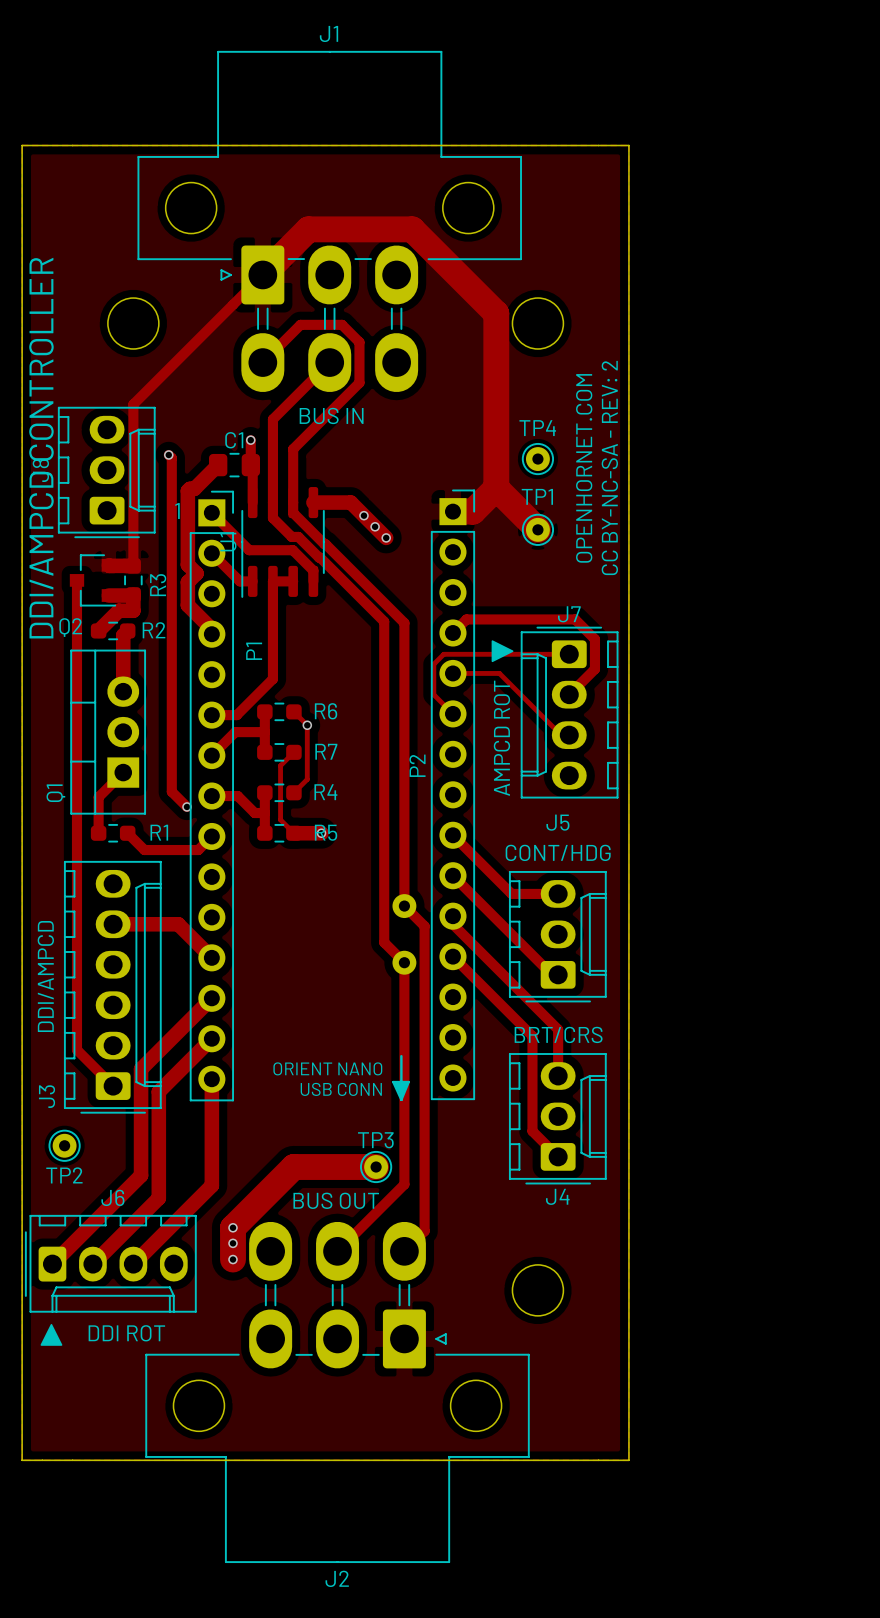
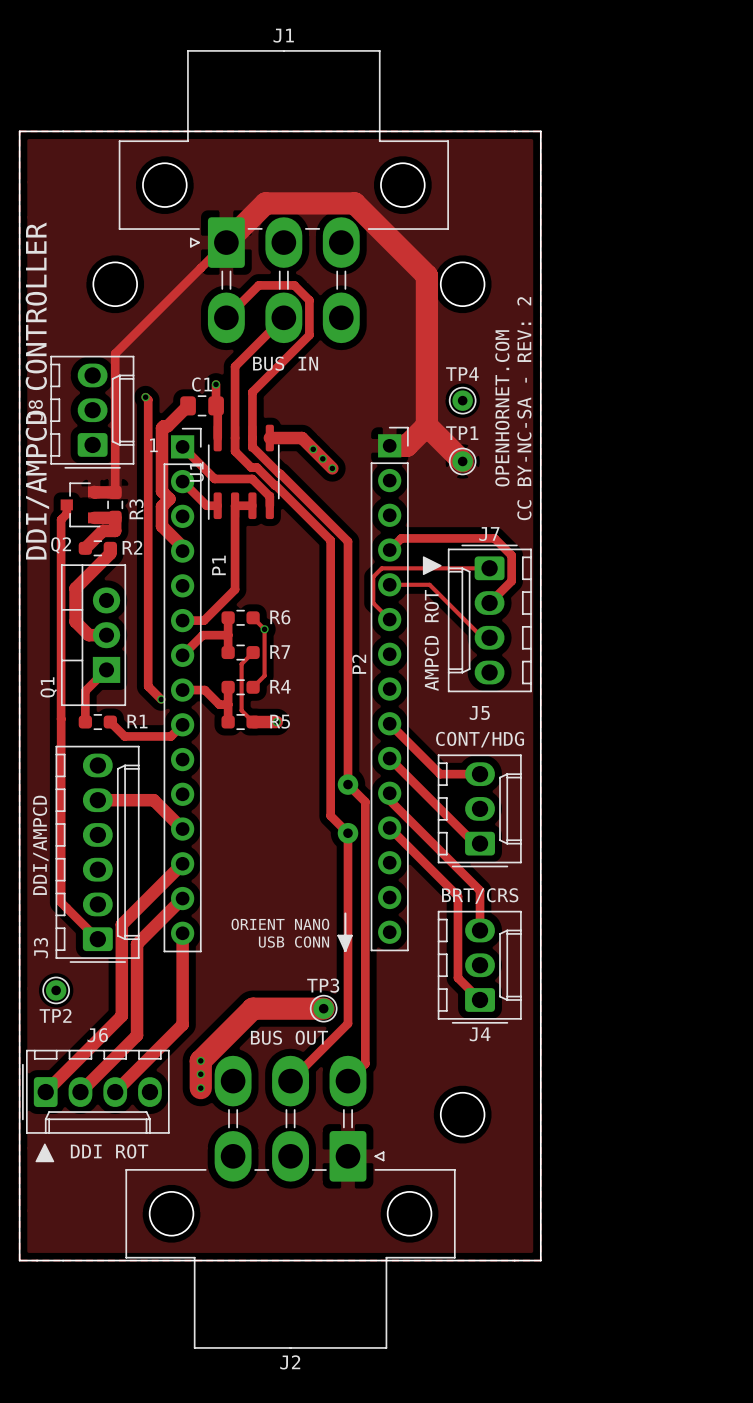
track: (76, 590) (76, 1049) -> (66, 513) (61, 519) (61, 719)
track: (127, 630) (123, 635) (123, 691) -> (110, 548) (110, 553) (75, 588) (75, 621) (88, 635) (106, 635)
track: none -> (61, 719) (61, 902) (66, 908)

